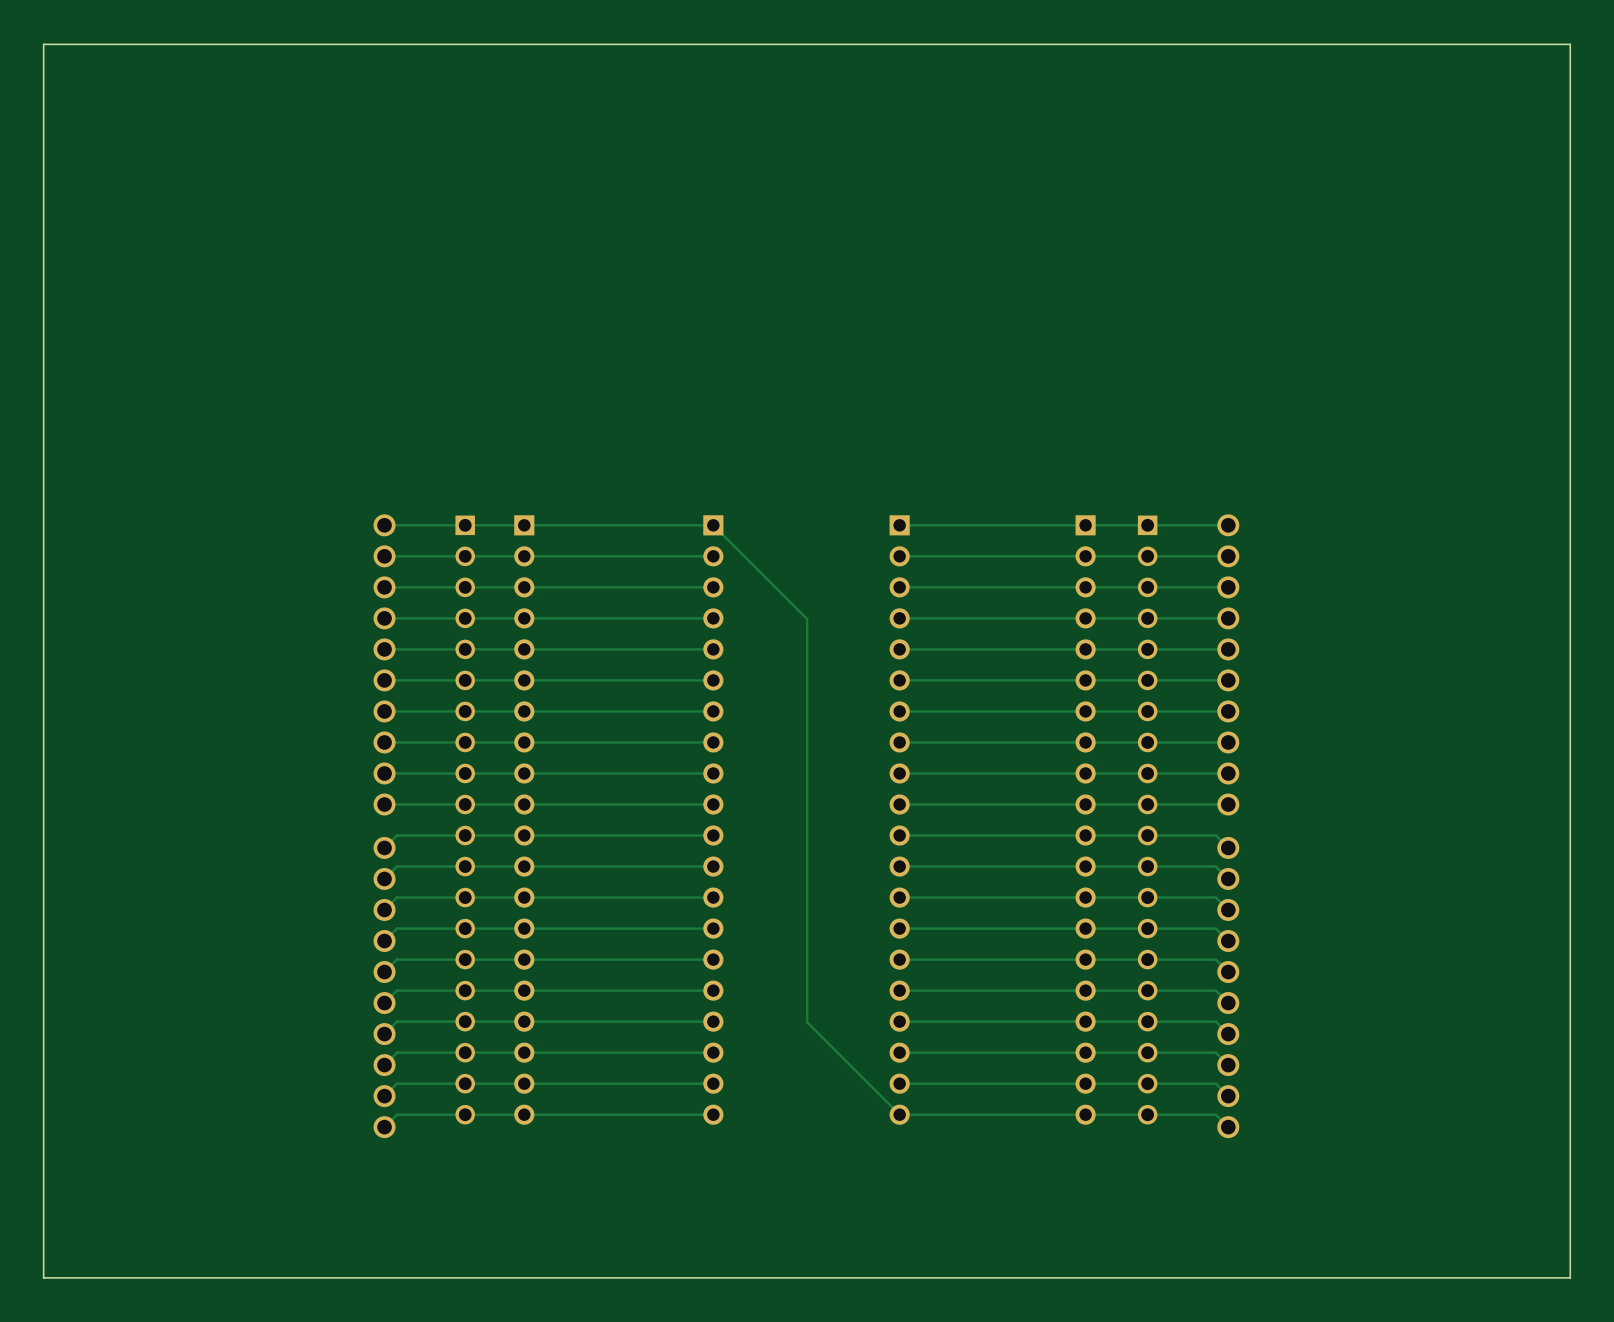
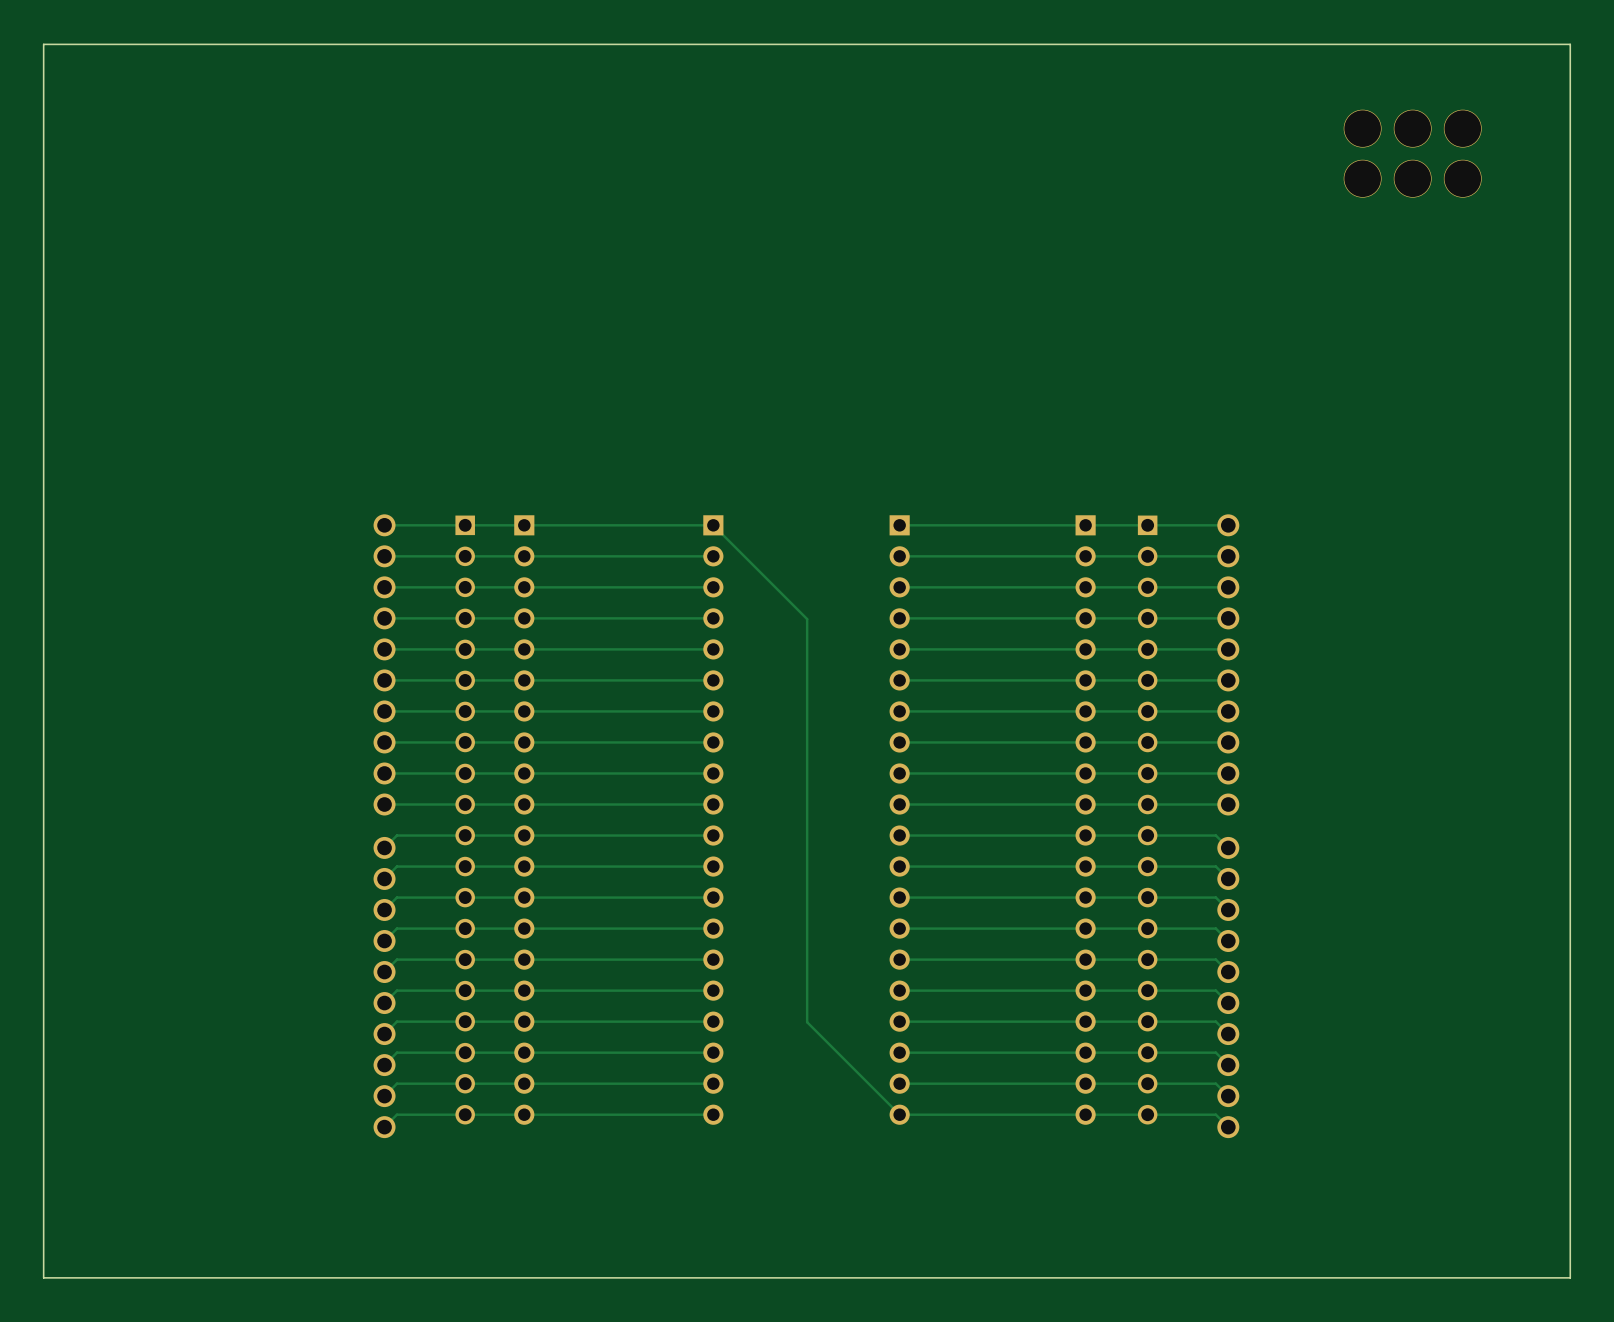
part: none -> (1362, 128)
part: none -> (1412, 128)
part: none -> (1462, 128)
part: none -> (1362, 178)
part: none -> (1412, 178)
part: none -> (1462, 178)

